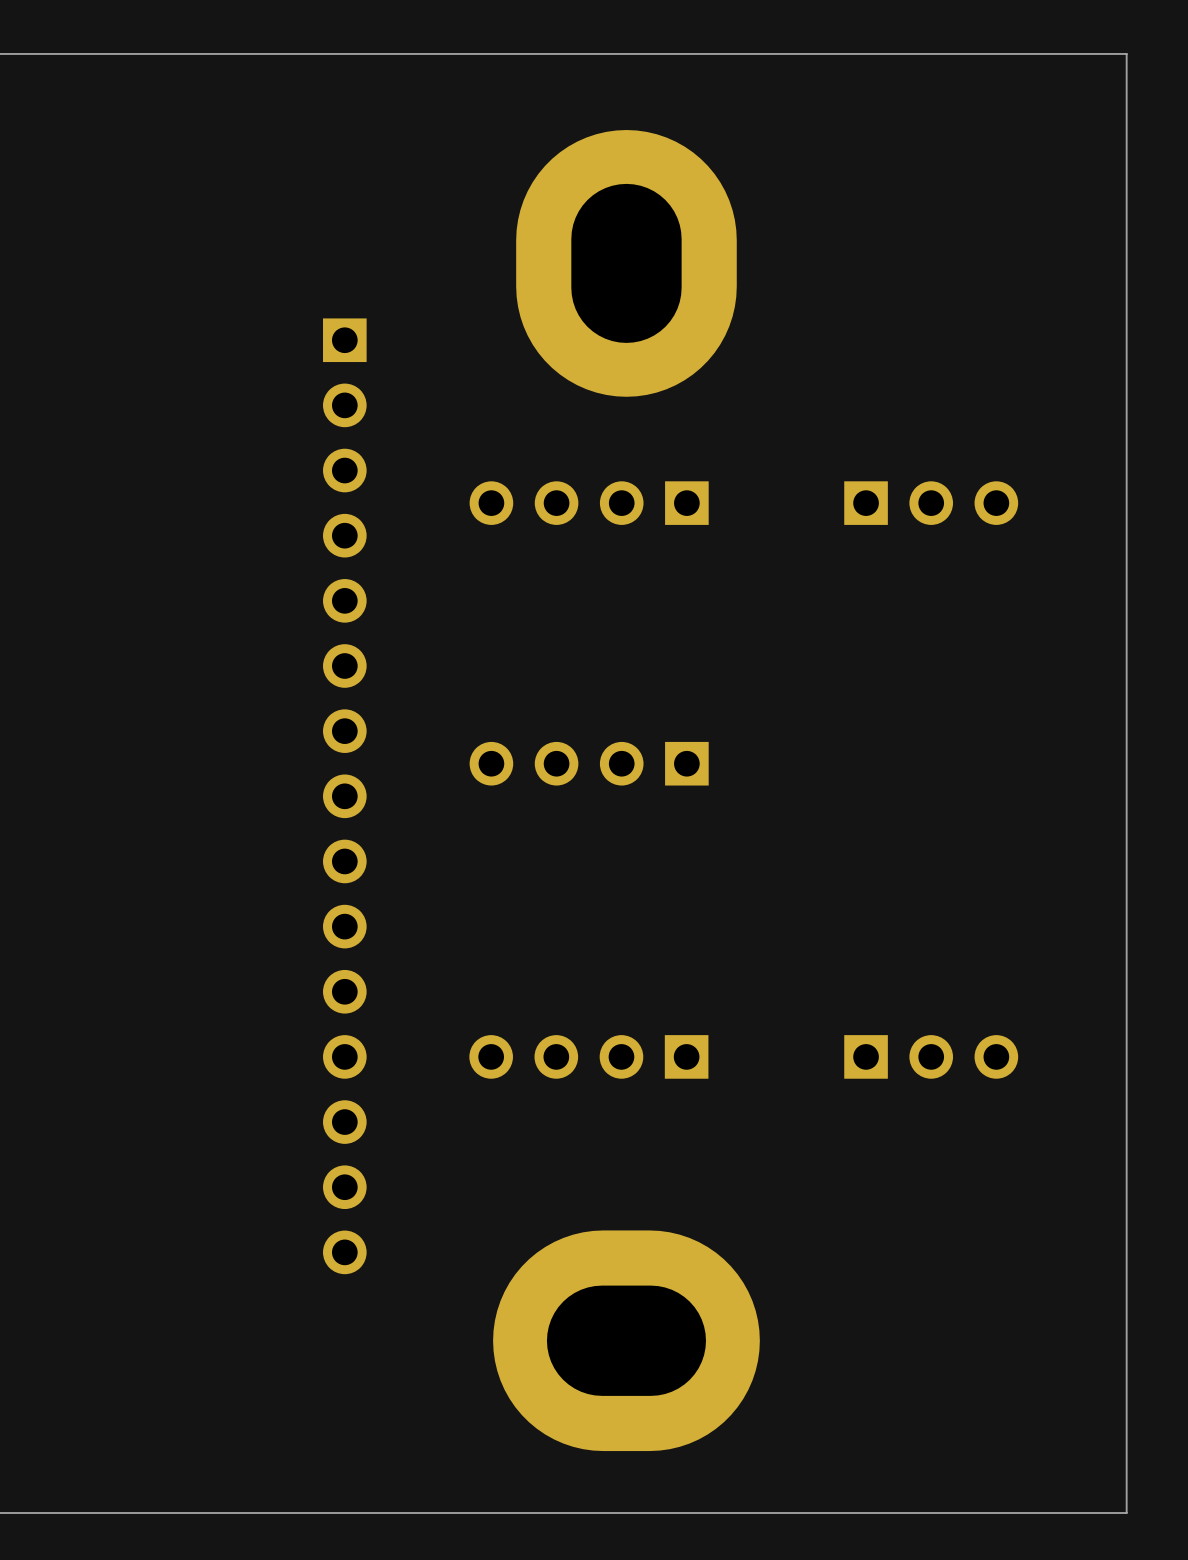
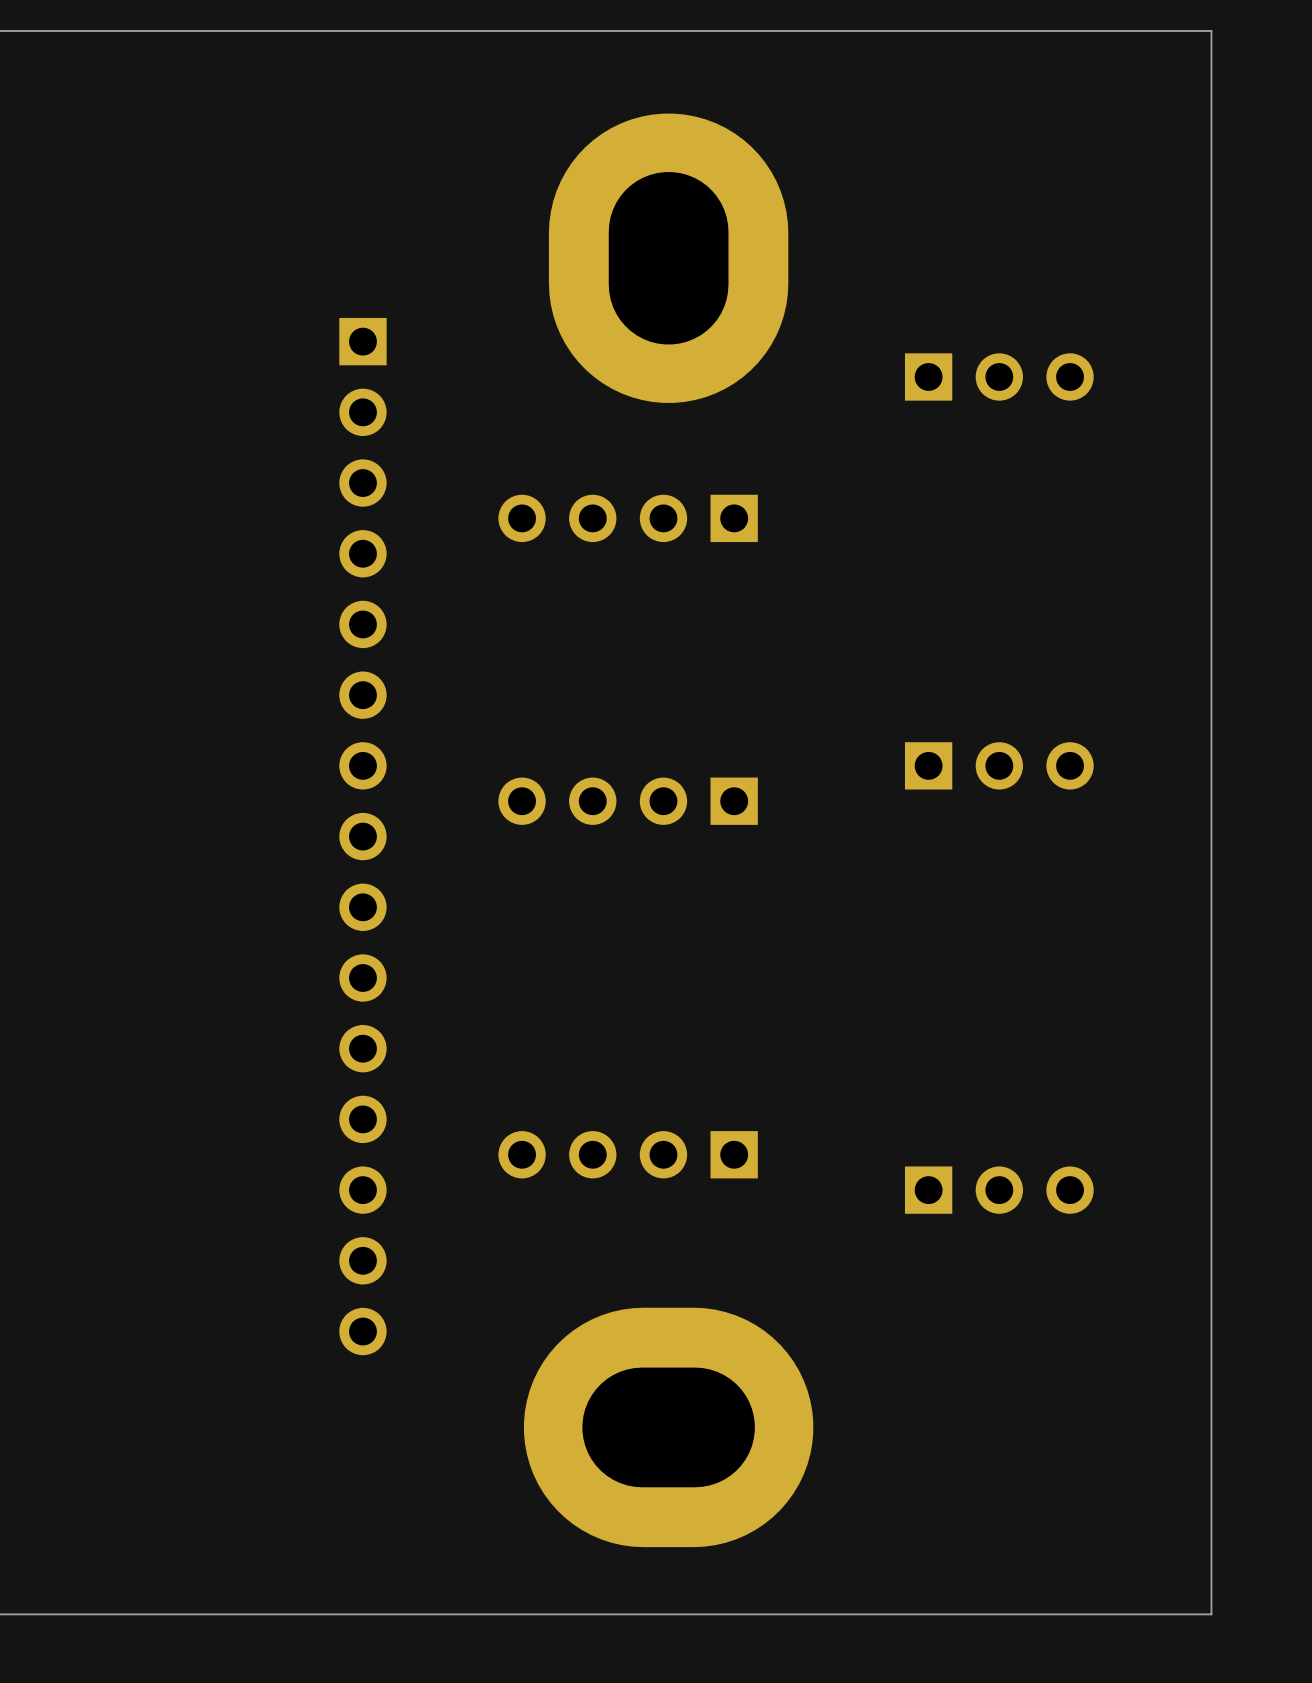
part: none -> (999, 376)
part: (931, 503) -> none
part: none -> (999, 765)
part position: (588, 1056) -> (628, 1154)
part position: (931, 1056) -> (999, 1190)

